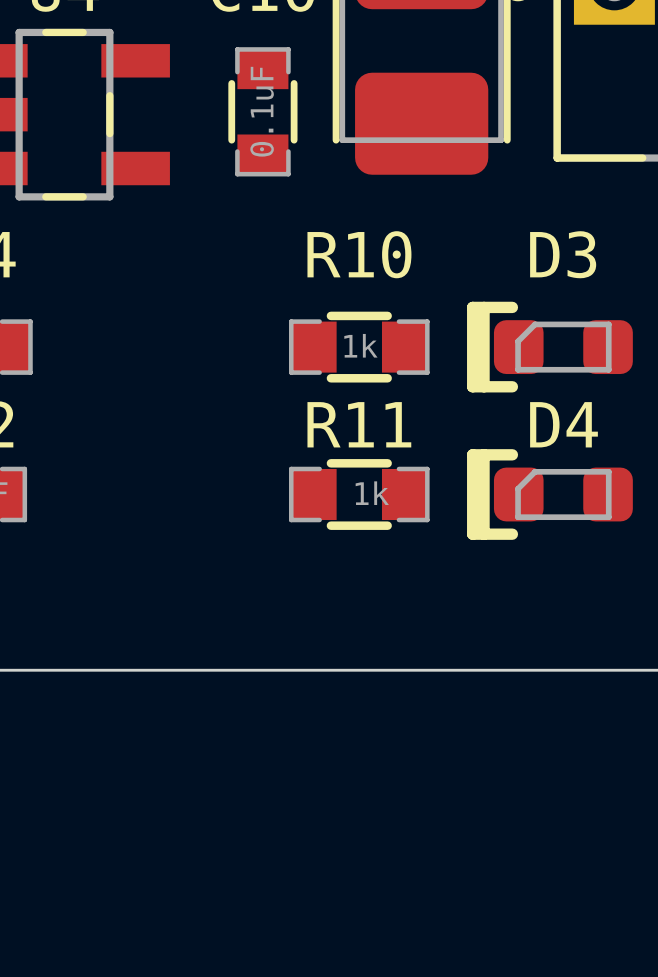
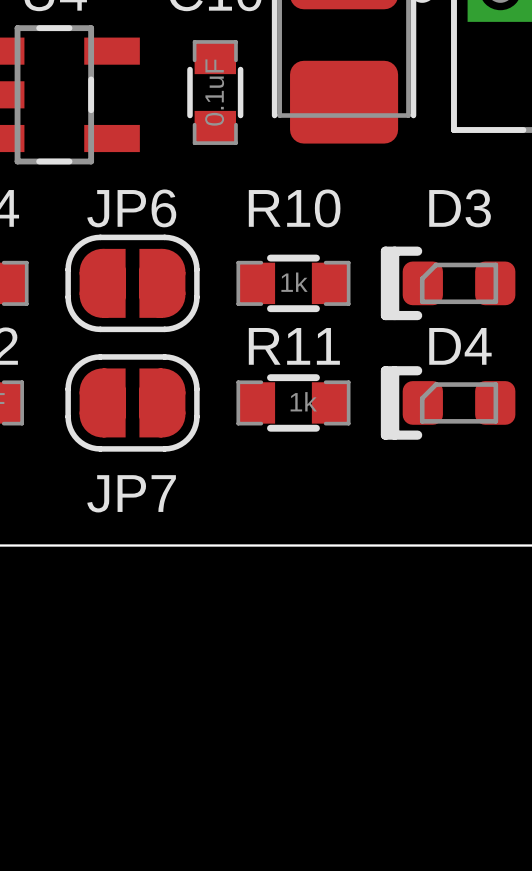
JP6: none -> (132, 283)
JP7: none -> (132, 402)

